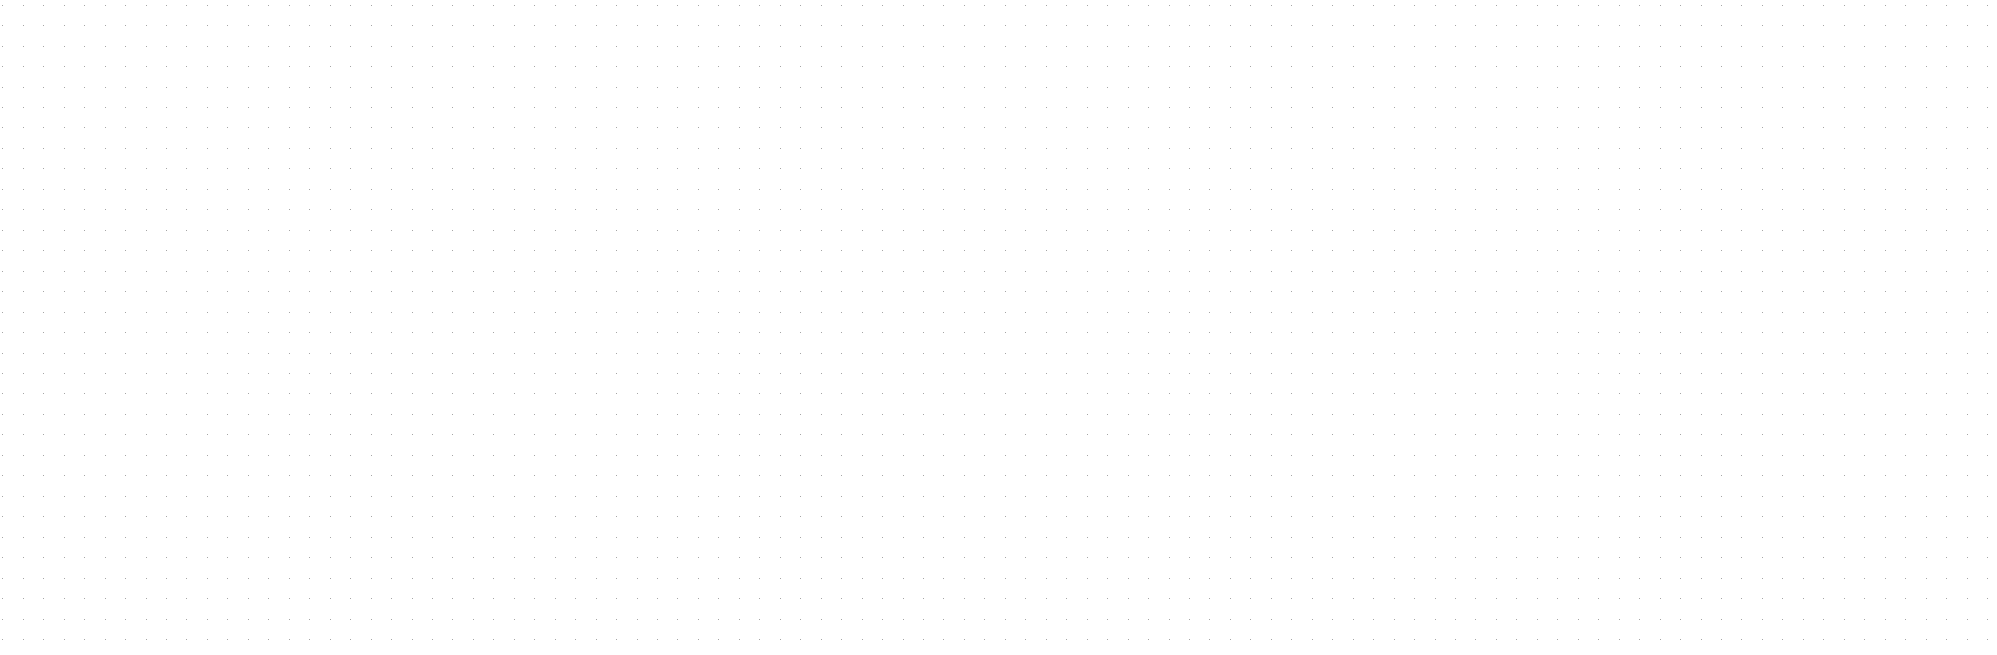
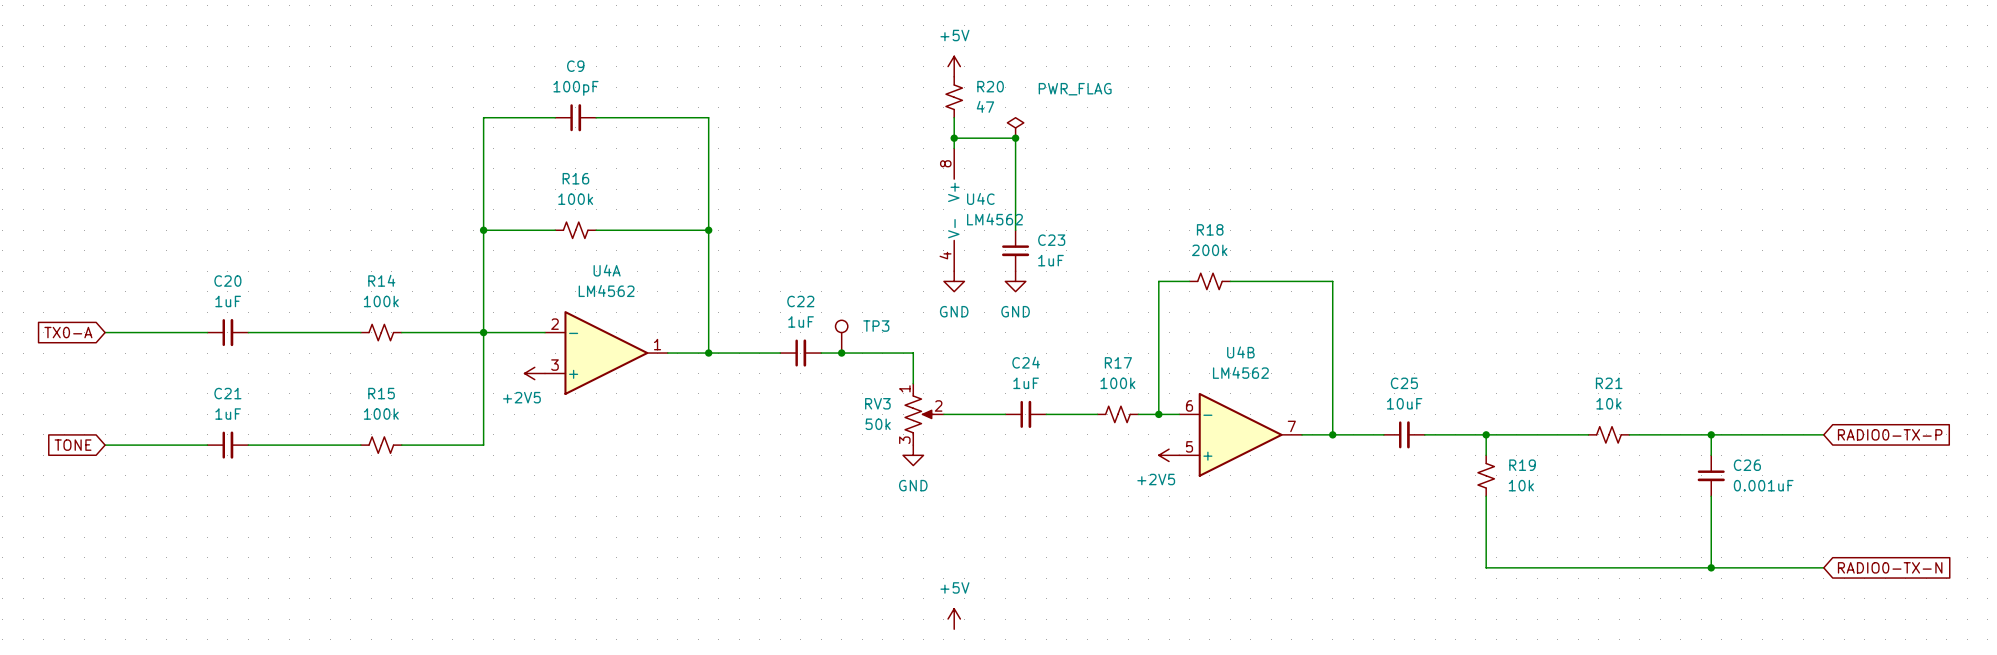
power symbol: none -> +5V (954, 66)
R20: none -> 47 (954, 97)
wire: none -> (555, 117) (483, 117) (483, 445) (401, 445)
C9: none -> 100pF (575, 117)
wire: none -> (596, 117) (708, 117) (708, 353)
wire: none -> (954, 117) (954, 148)
power symbol: none -> PWR_FLAG (1015, 127)
wire: none -> (954, 138) (1015, 138) (1015, 230)
junction: none -> (954, 138)
junction: none -> (1015, 138)
U4C: none -> LM4562 (954, 209)
wire: none -> (483, 230) (555, 230)
junction: none -> (483, 230)
R16: none -> 100k (575, 230)
wire: none -> (596, 230) (708, 230)
junction: none -> (708, 230)
C23: none -> 1uF (1015, 250)
power symbol: none -> GND (954, 281)
power symbol: none -> GND (1015, 281)
wire: none -> (1189, 281) (1158, 281) (1158, 414)
R18: none -> 200k (1209, 281)
wire: none -> (1230, 281) (1332, 281) (1332, 434)
global label: none -> TX0-A (68, 332)
wire: none -> (105, 332) (207, 332)
C20: none -> 1uF (227, 332)
wire: none -> (248, 332) (360, 332)
R14: none -> 100k (381, 332)
wire: none -> (401, 332) (544, 332)
junction: none -> (483, 332)
TP3: none -> (841, 336)
U4A: none -> LM4562 (606, 353)
wire: none -> (667, 353) (780, 353)
junction: none -> (708, 353)
C22: none -> 1uF (800, 353)
wire: none -> (821, 353) (913, 353) (913, 383)
junction: none -> (841, 353)
power symbol: none -> +2V5 (534, 373)
RV3: none -> 50k (924, 414)
wire: none -> (943, 414) (1005, 414)
C24: none -> 1uF (1025, 414)
wire: none -> (1046, 414) (1097, 414)
R17: none -> 100k (1117, 414)
wire: none -> (1138, 414) (1179, 414)
junction: none -> (1158, 414)
U4B: none -> LM4562 (1240, 434)
wire: none -> (1302, 434) (1383, 434)
junction: none -> (1332, 434)
C25: none -> 10uF (1404, 434)
wire: none -> (1424, 434) (1588, 434)
wire: none -> (1486, 434) (1486, 455)
junction: none -> (1486, 434)
R21: none -> 10k (1608, 434)
wire: none -> (1629, 434) (1823, 434)
wire: none -> (1711, 434) (1711, 455)
junction: none -> (1711, 434)
global label: none -> RADIO0-TX-P (1890, 434)
global label: none -> TONE (73, 445)
wire: none -> (105, 445) (207, 445)
C21: none -> 1uF (227, 445)
wire: none -> (248, 445) (360, 445)
R15: none -> 100k (381, 445)
power symbol: none -> GND (913, 455)
power symbol: none -> +2V5 (1169, 455)
R19: none -> 10k (1486, 475)
C26: none -> 0.001uF (1711, 475)
wire: none -> (1486, 496) (1486, 567) (1823, 567)
wire: none -> (1711, 496) (1711, 567)
junction: none -> (1711, 567)
global label: none -> RADIO0-TX-N (1890, 567)
power symbol: none -> +5V (954, 619)

